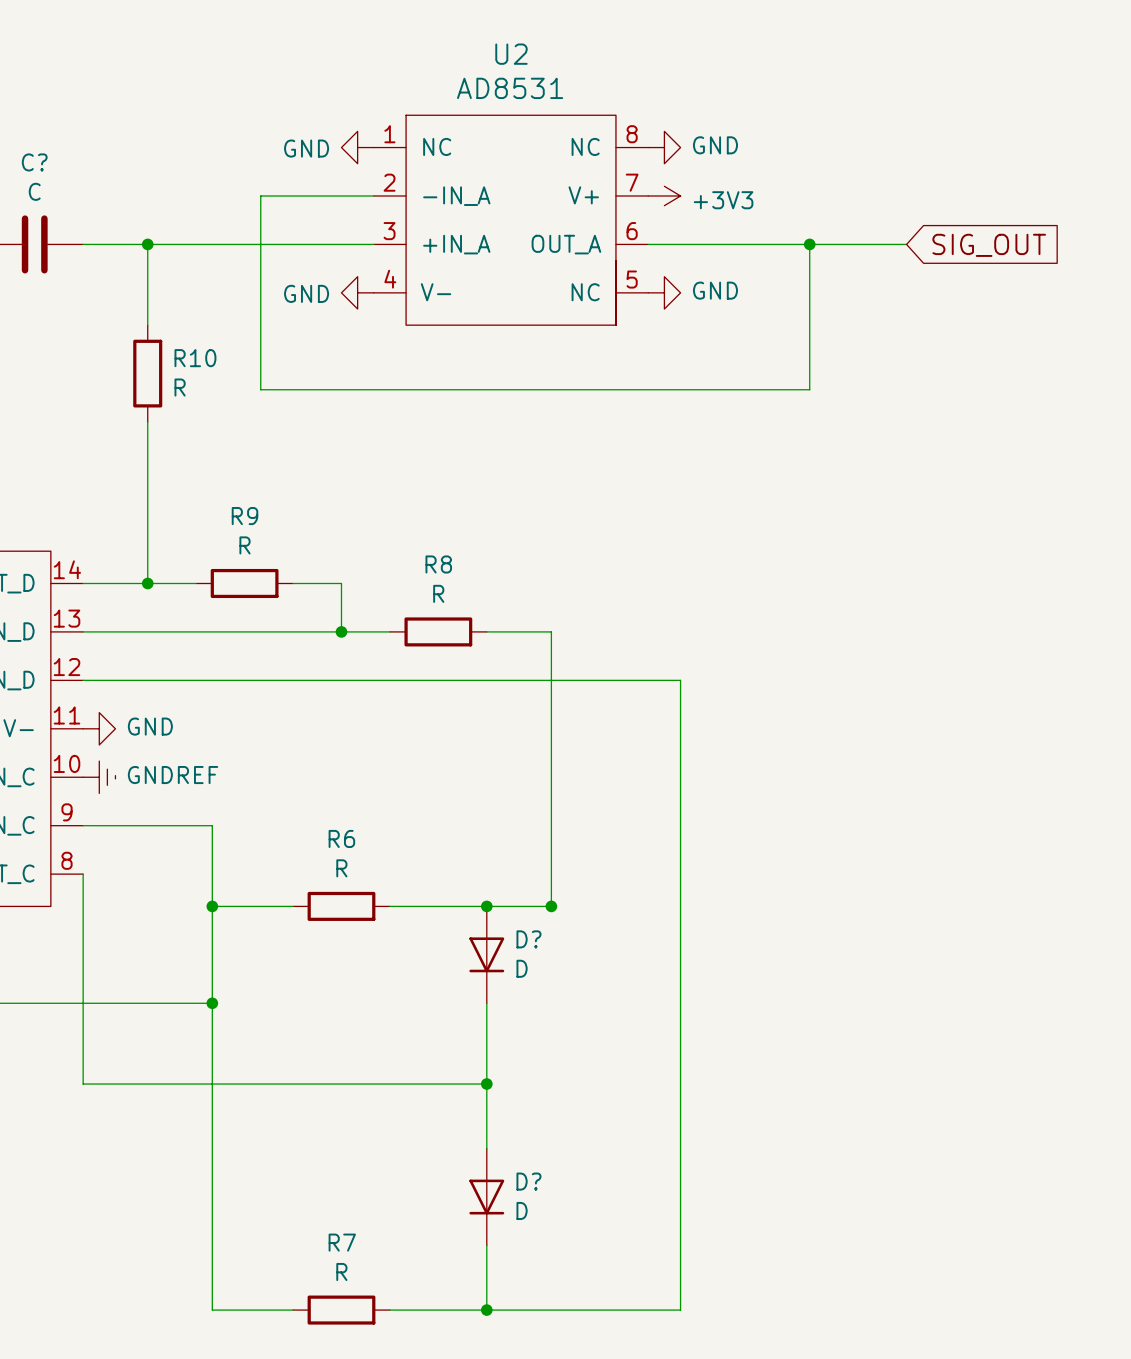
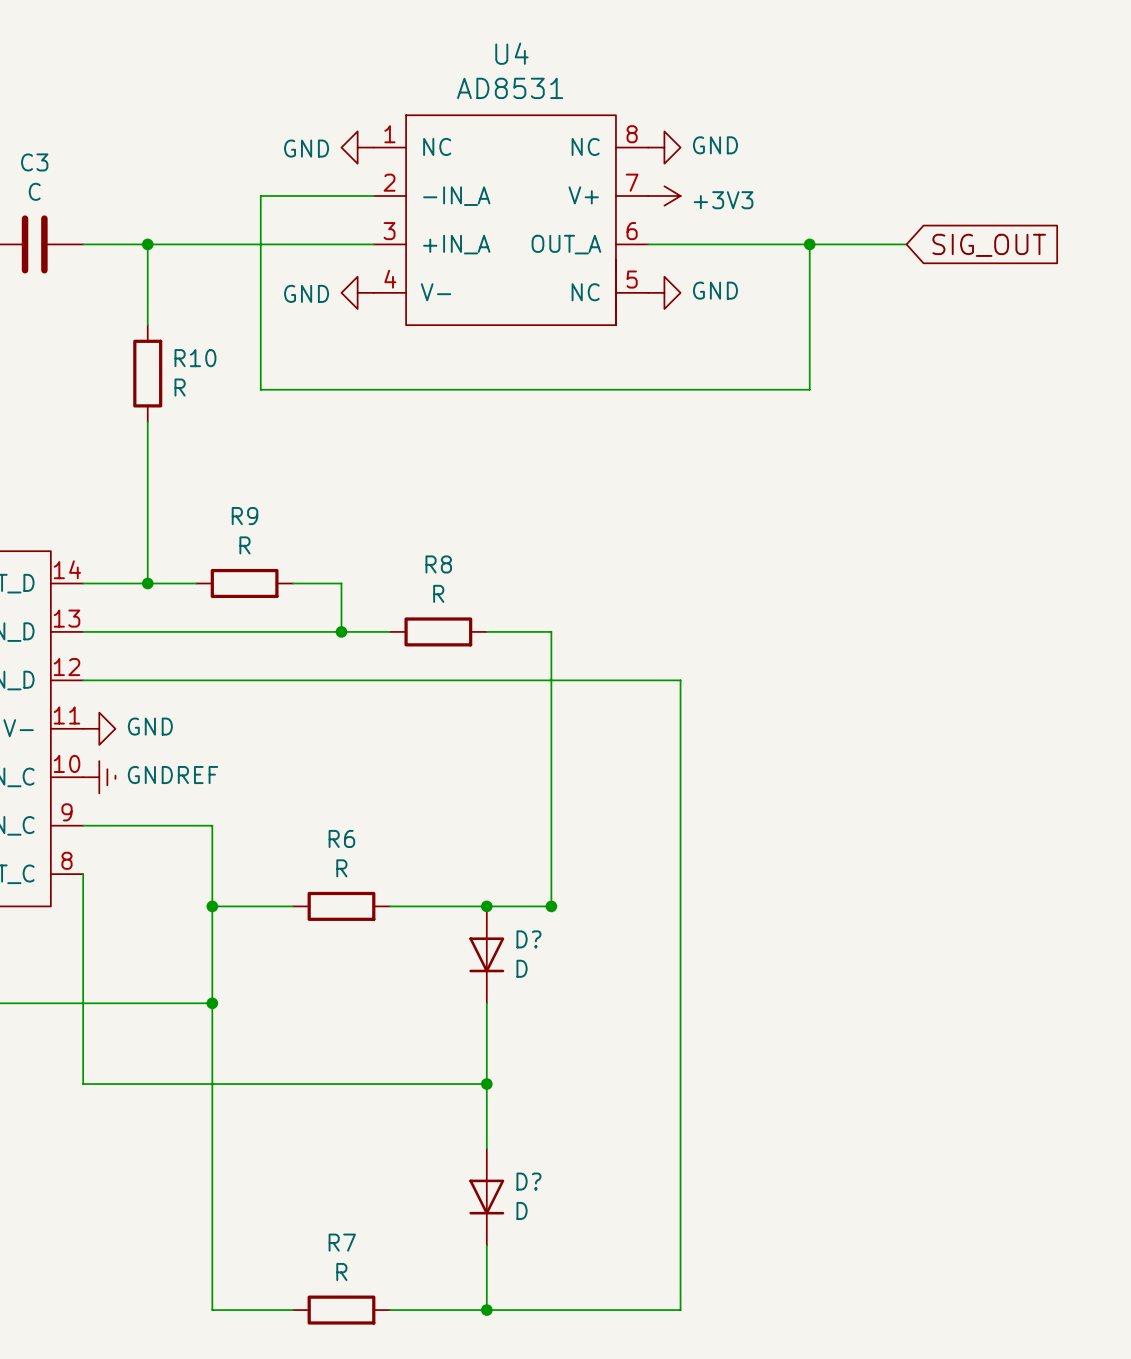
U2 name: U2 (511, 54) -> U4 (511, 53)
C? name: C? (34, 162) -> C3 (34, 162)

